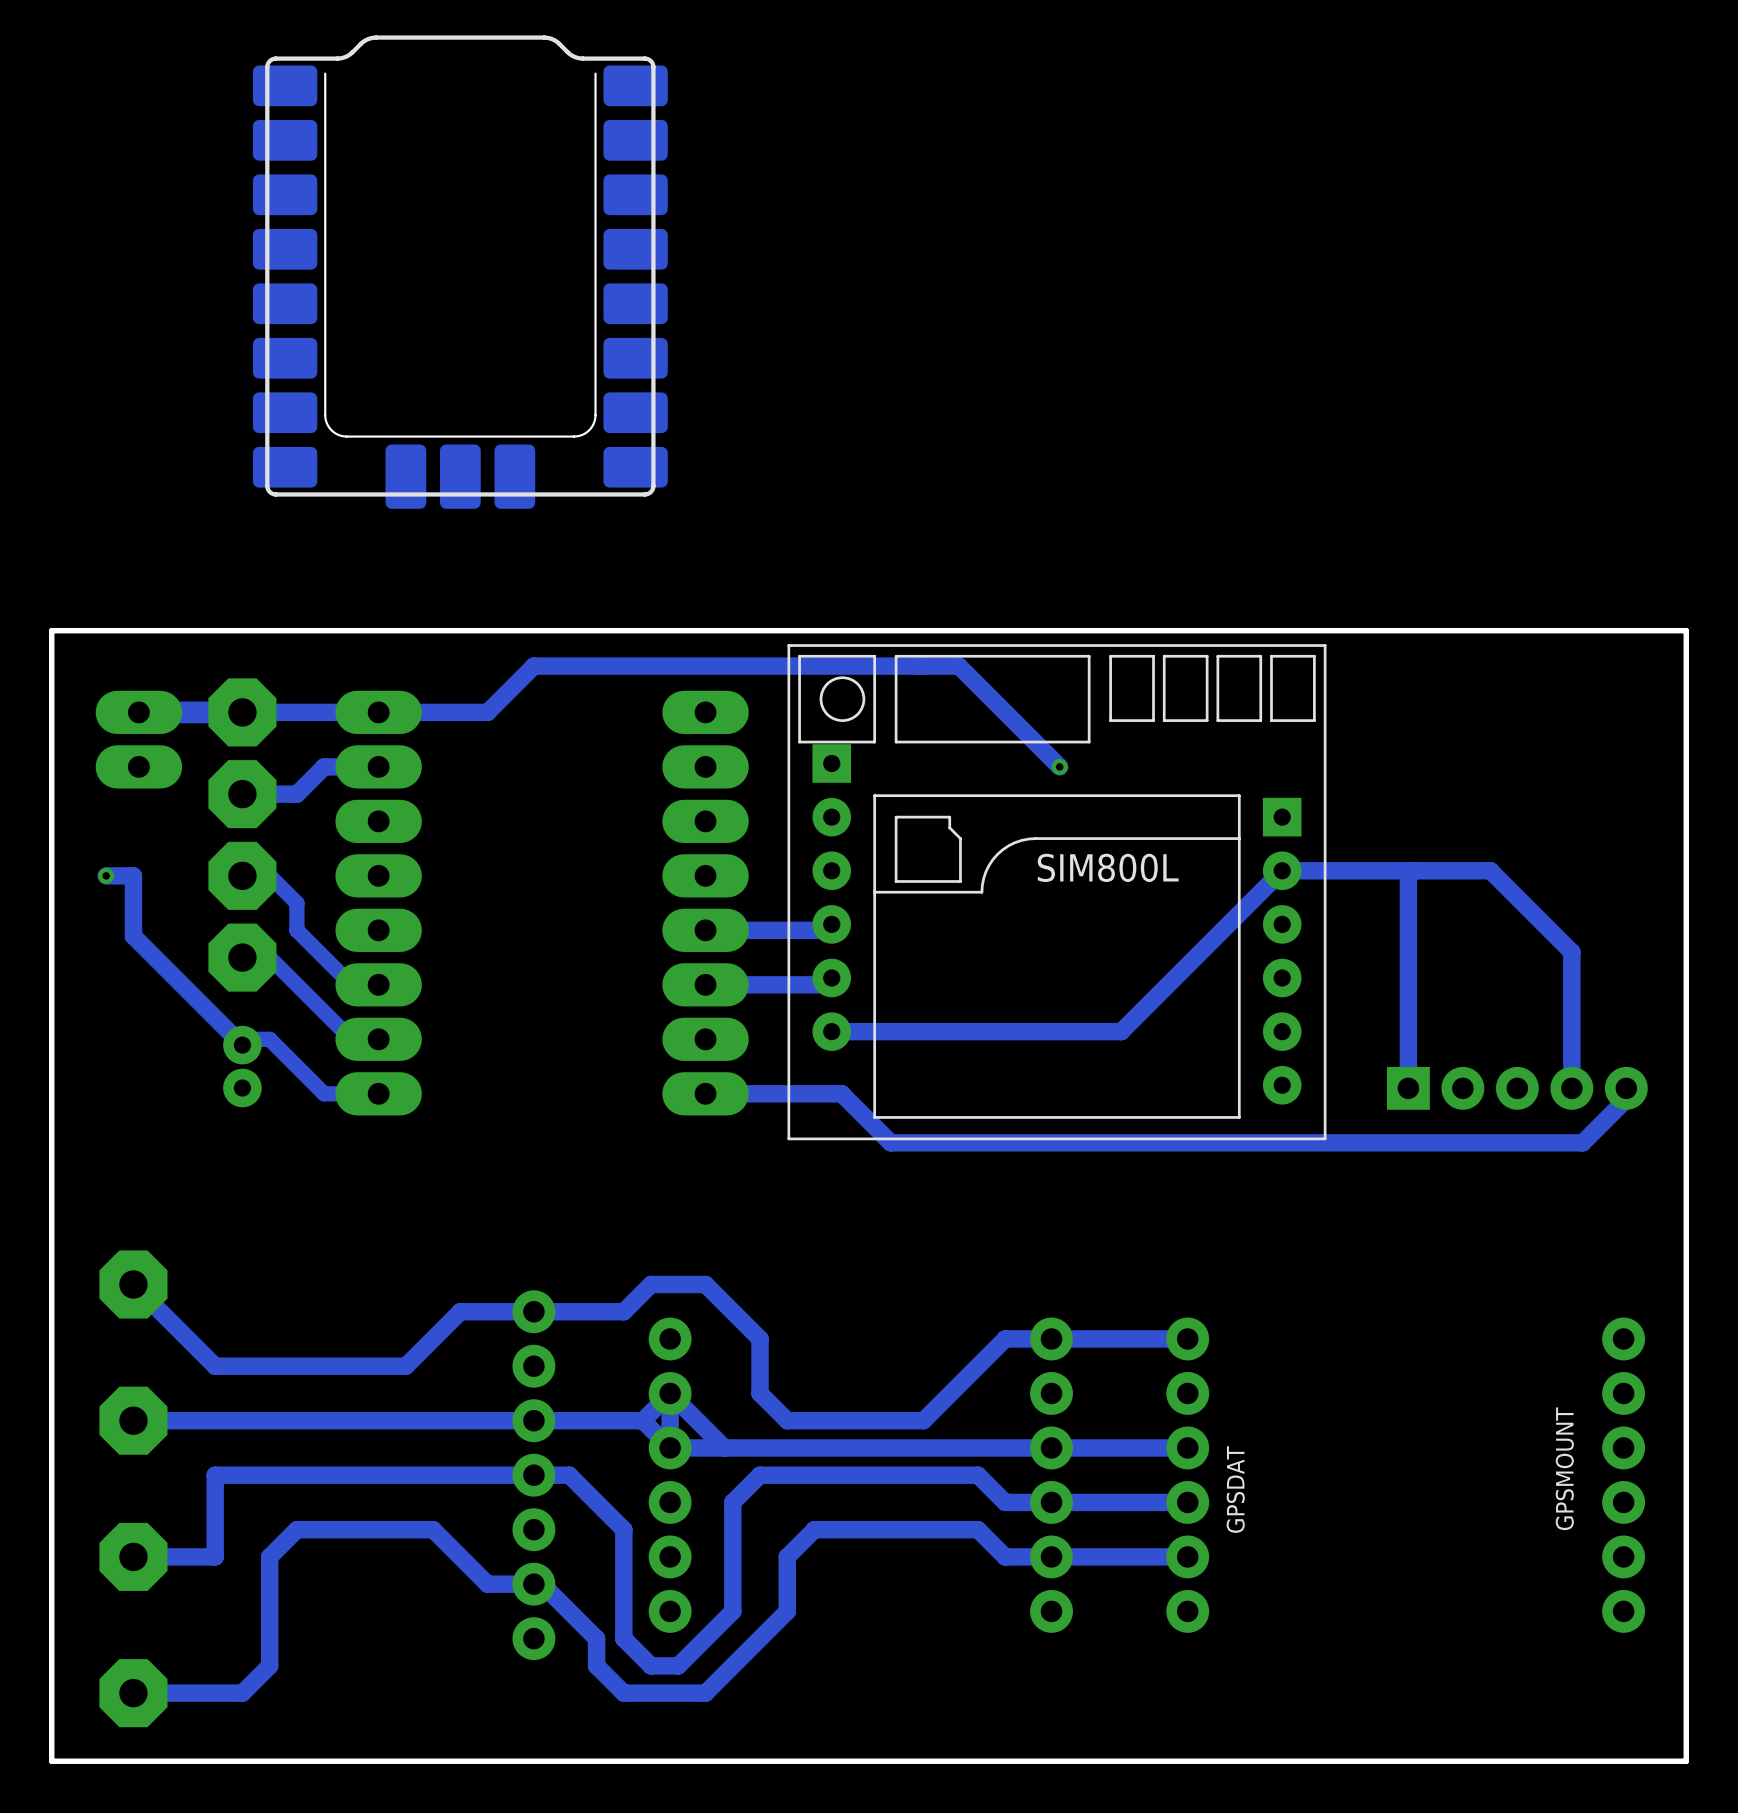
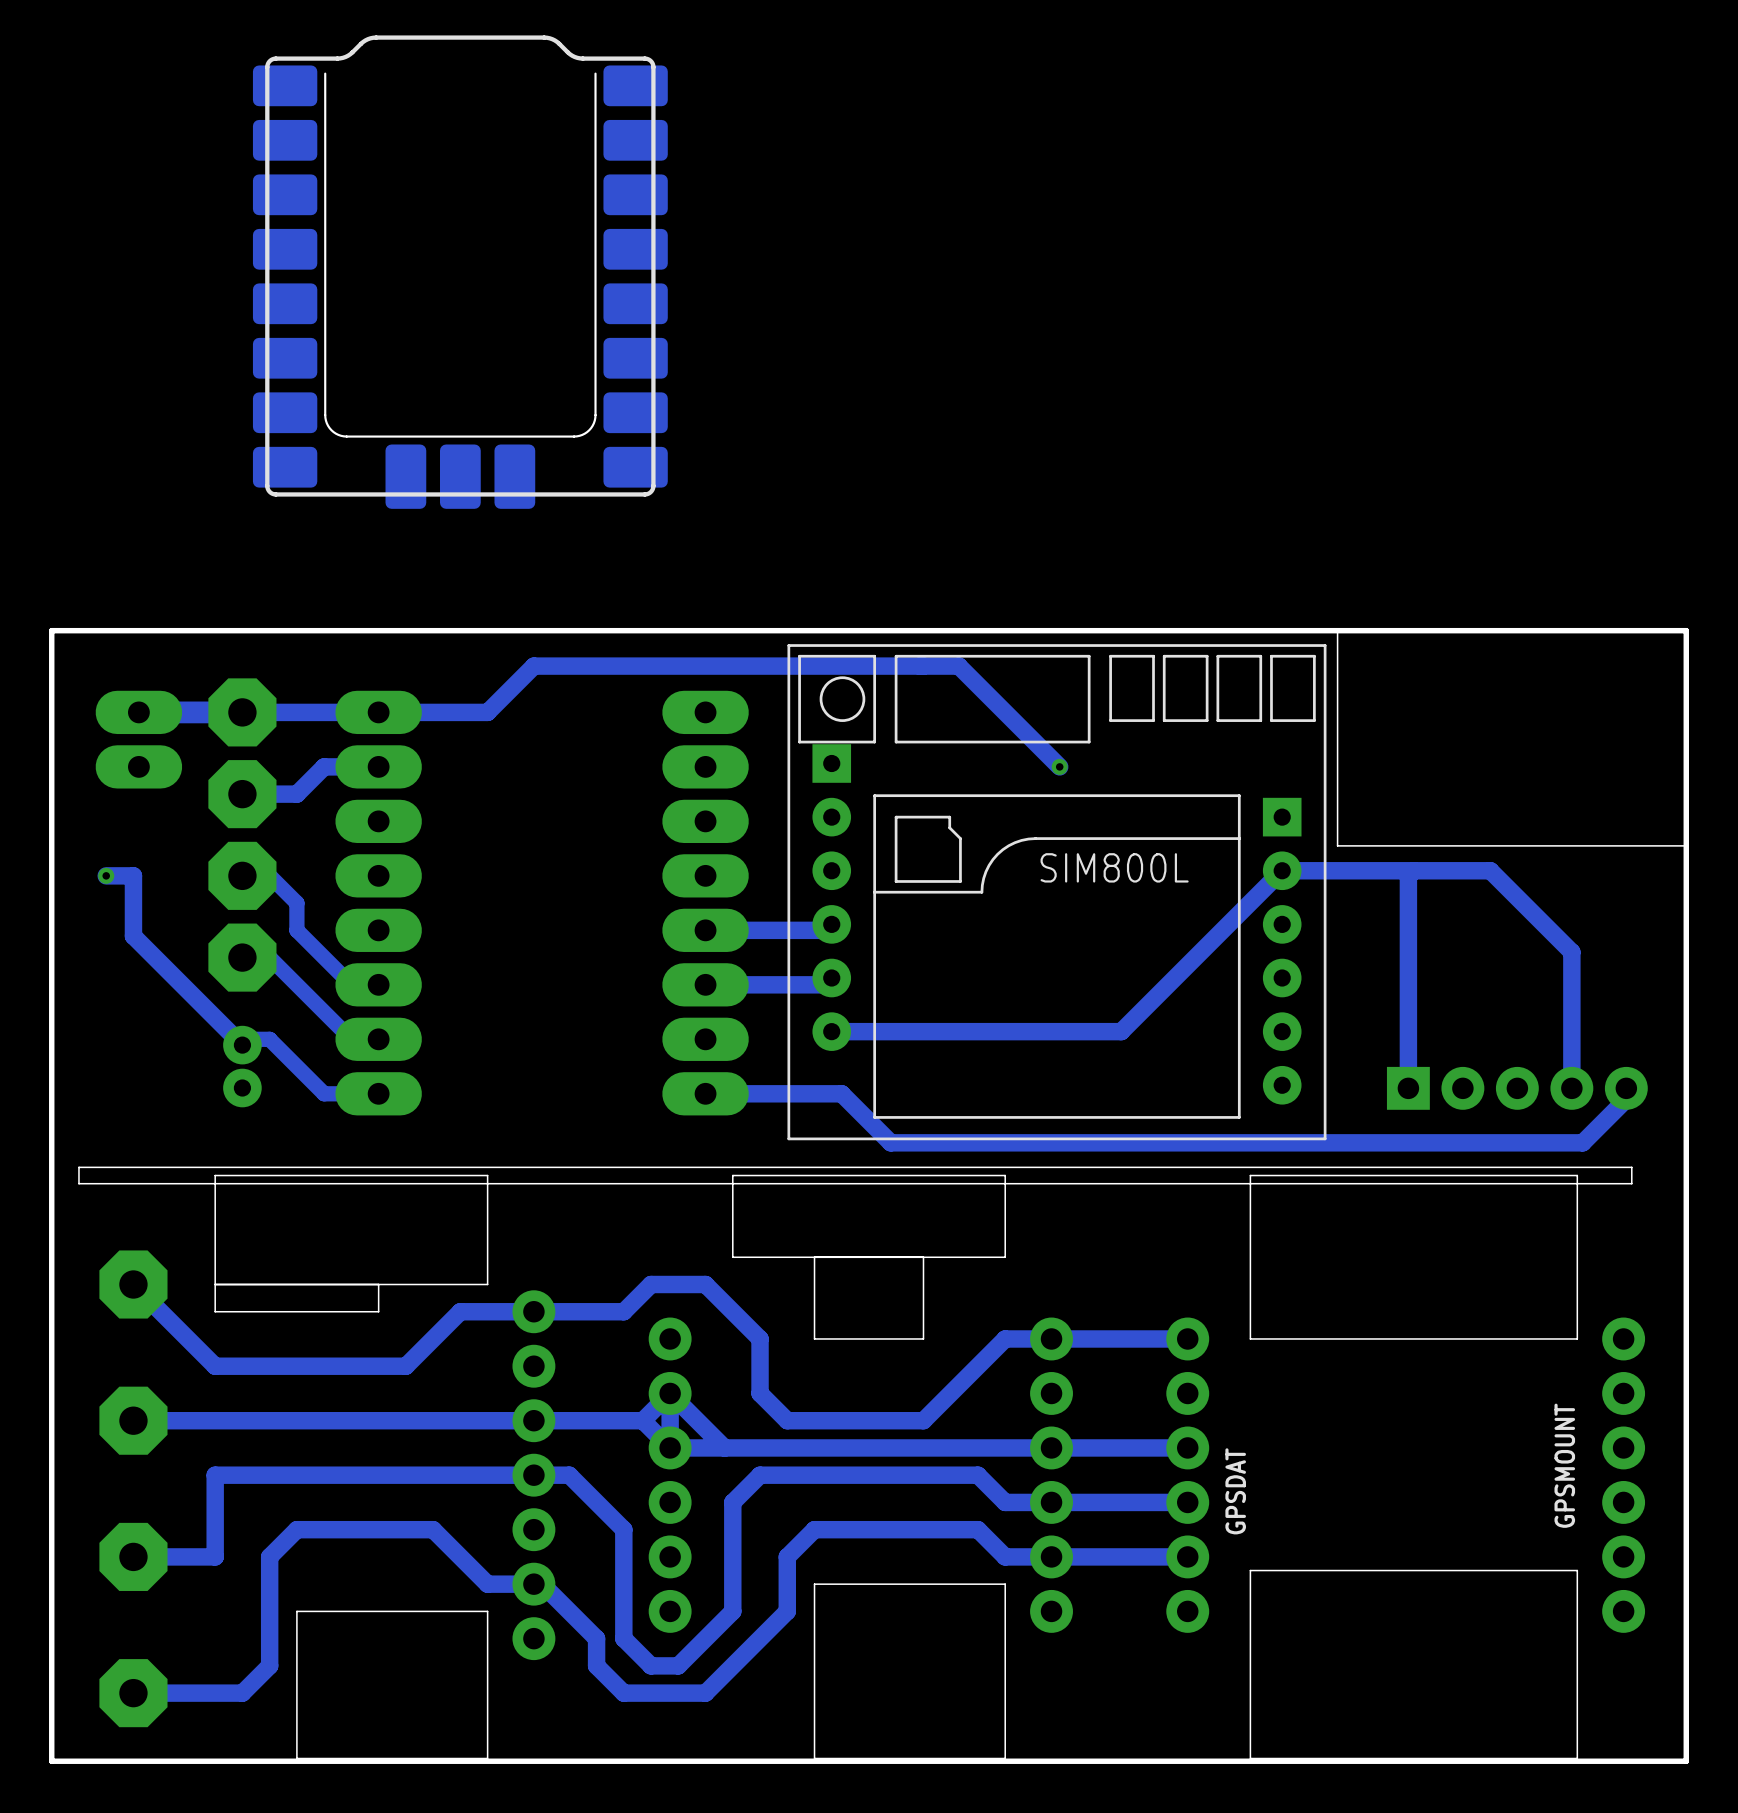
board edge: none -> (1686, 630) (1337, 630) (1337, 845) (1686, 845) (1686, 630)
board edge: none -> (1631, 1167) (78, 1167) (78, 1183) (1631, 1183) (1631, 1167)
board edge: none -> (1005, 1175) (732, 1175) (732, 1257) (1005, 1257) (1005, 1175)
board edge: none -> (1577, 1175) (1250, 1175) (1250, 1338) (1577, 1338) (1577, 1175)
board edge: none -> (923, 1257) (923, 1338) (814, 1338) (814, 1257)
board edge: none -> (378, 1284) (378, 1311) (215, 1311) (215, 1175) (487, 1175) (487, 1284) (215, 1284)
board edge: none -> (1577, 1570) (1577, 1758) (1250, 1758) (1250, 1570) (1577, 1570)
board edge: none -> (1005, 1584) (1005, 1758) (814, 1758) (814, 1584) (1005, 1584)
board edge: none -> (487, 1611) (487, 1758) (296, 1758) (296, 1611) (487, 1611)

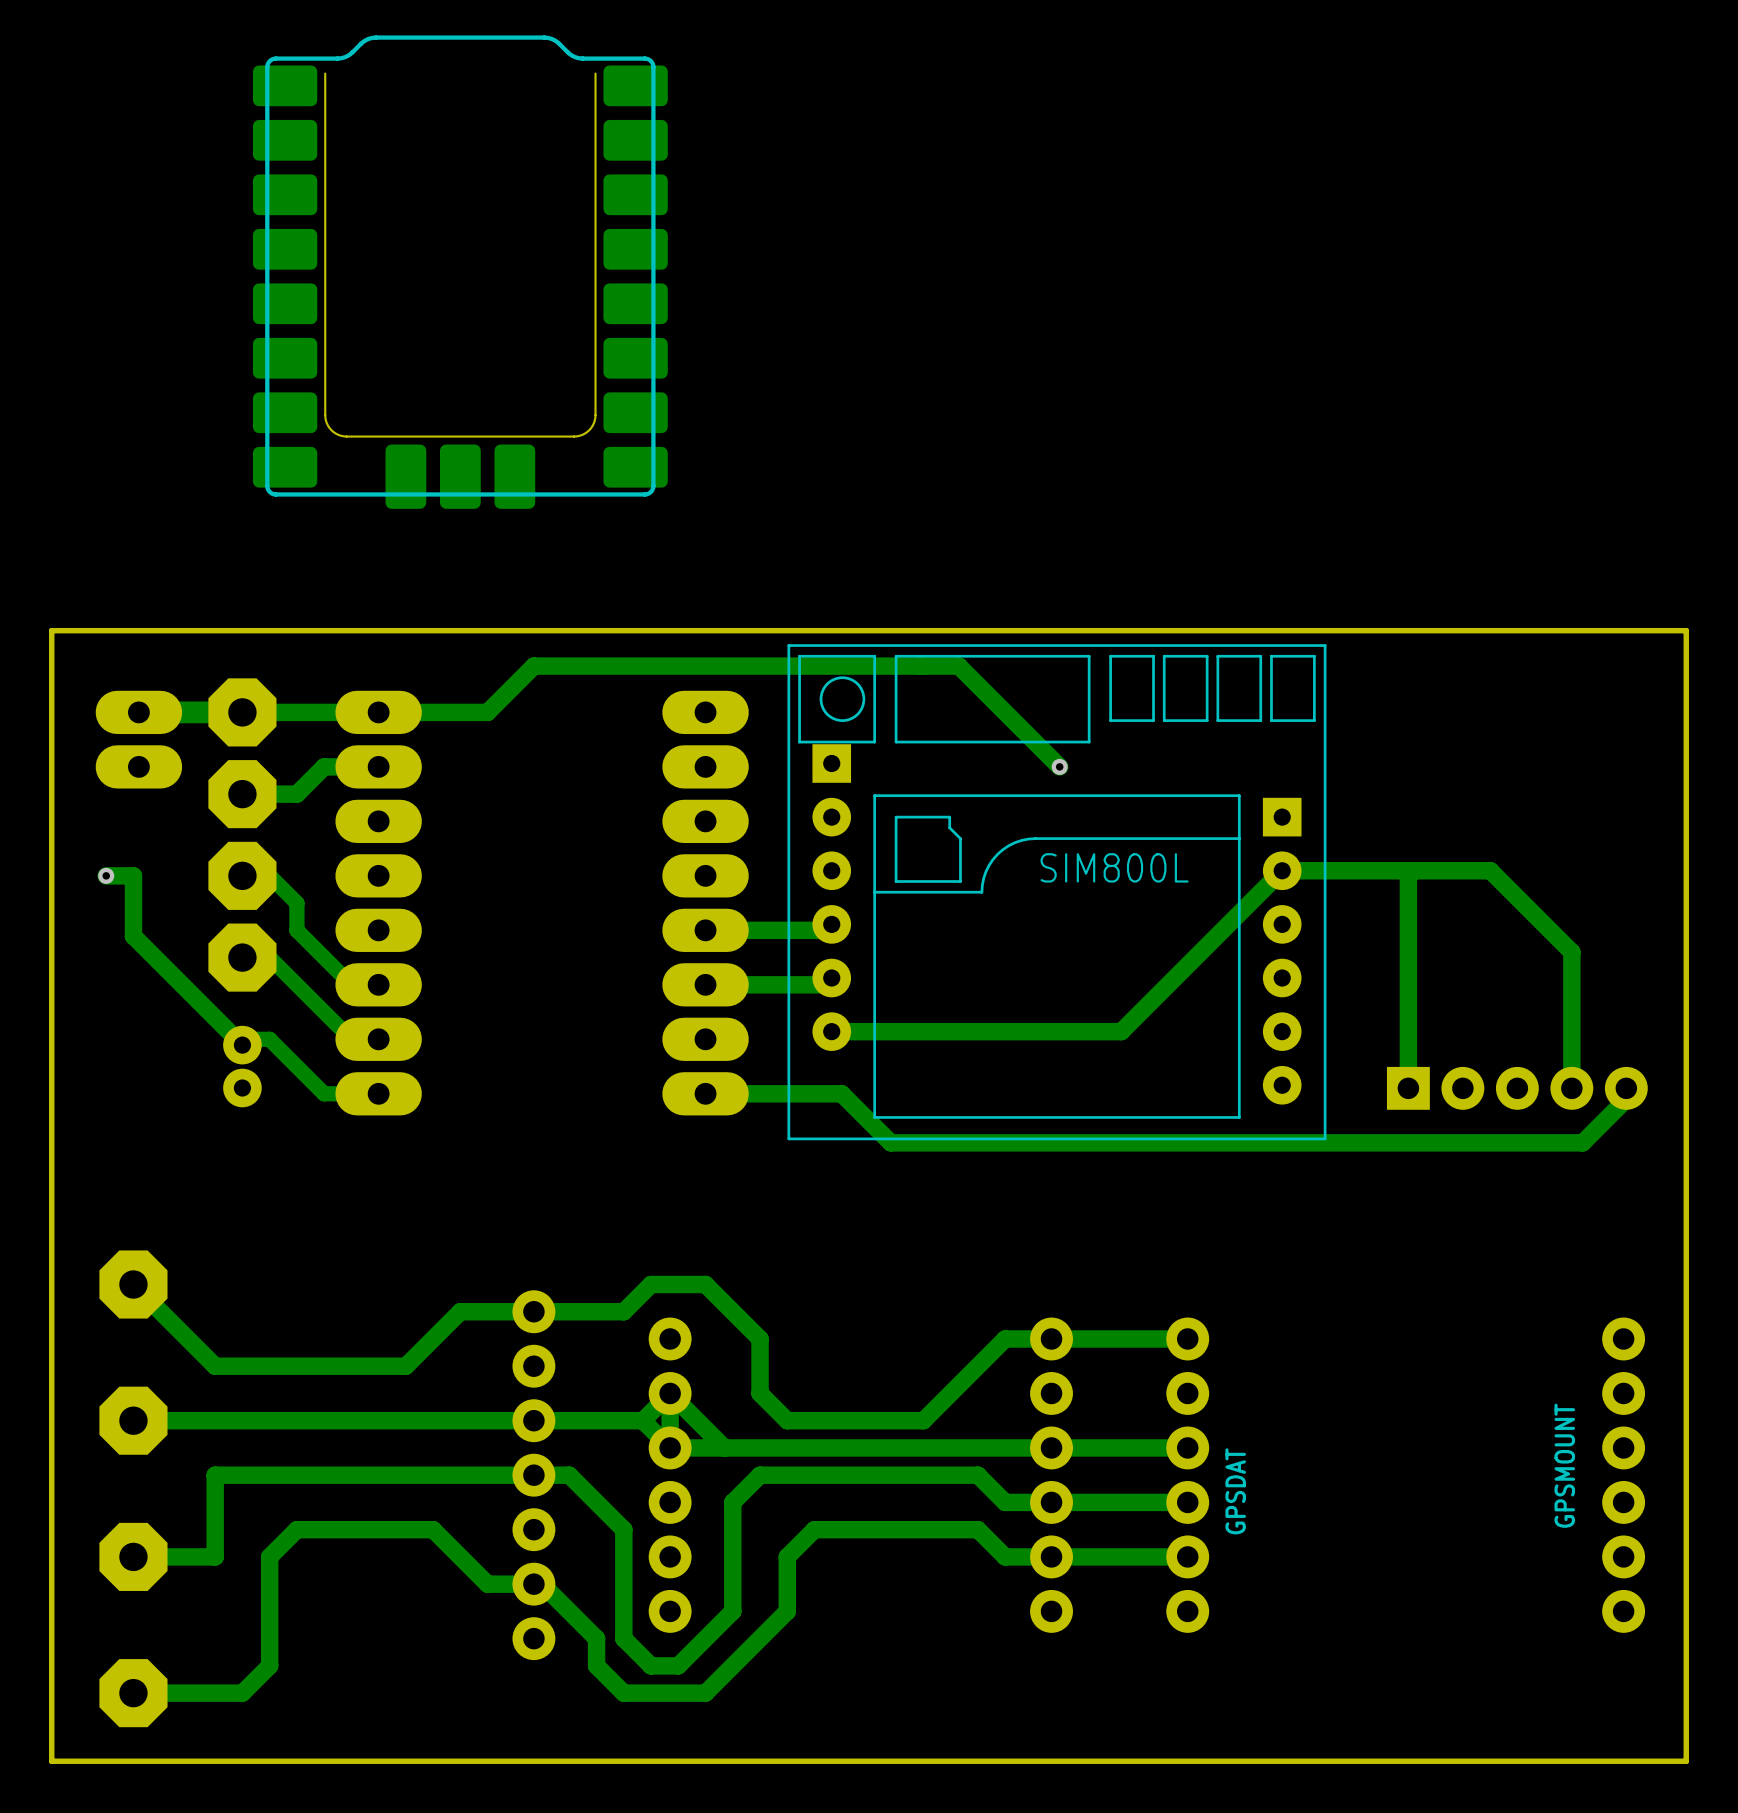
board edge: (1686, 630) (1337, 630) (1337, 845) (1686, 845) (1686, 630) -> none
board edge: (1631, 1167) (78, 1167) (78, 1183) (1631, 1183) (1631, 1167) -> none
board edge: (1005, 1175) (732, 1175) (732, 1257) (1005, 1257) (1005, 1175) -> none
board edge: (1577, 1175) (1250, 1175) (1250, 1338) (1577, 1338) (1577, 1175) -> none
board edge: (923, 1257) (923, 1338) (814, 1338) (814, 1257) -> none
board edge: (378, 1284) (378, 1311) (215, 1311) (215, 1175) (487, 1175) (487, 1284) (215, 1284) -> none
board edge: (1577, 1570) (1577, 1758) (1250, 1758) (1250, 1570) (1577, 1570) -> none
board edge: (1005, 1584) (1005, 1758) (814, 1758) (814, 1584) (1005, 1584) -> none
board edge: (487, 1611) (487, 1758) (296, 1758) (296, 1611) (487, 1611) -> none

